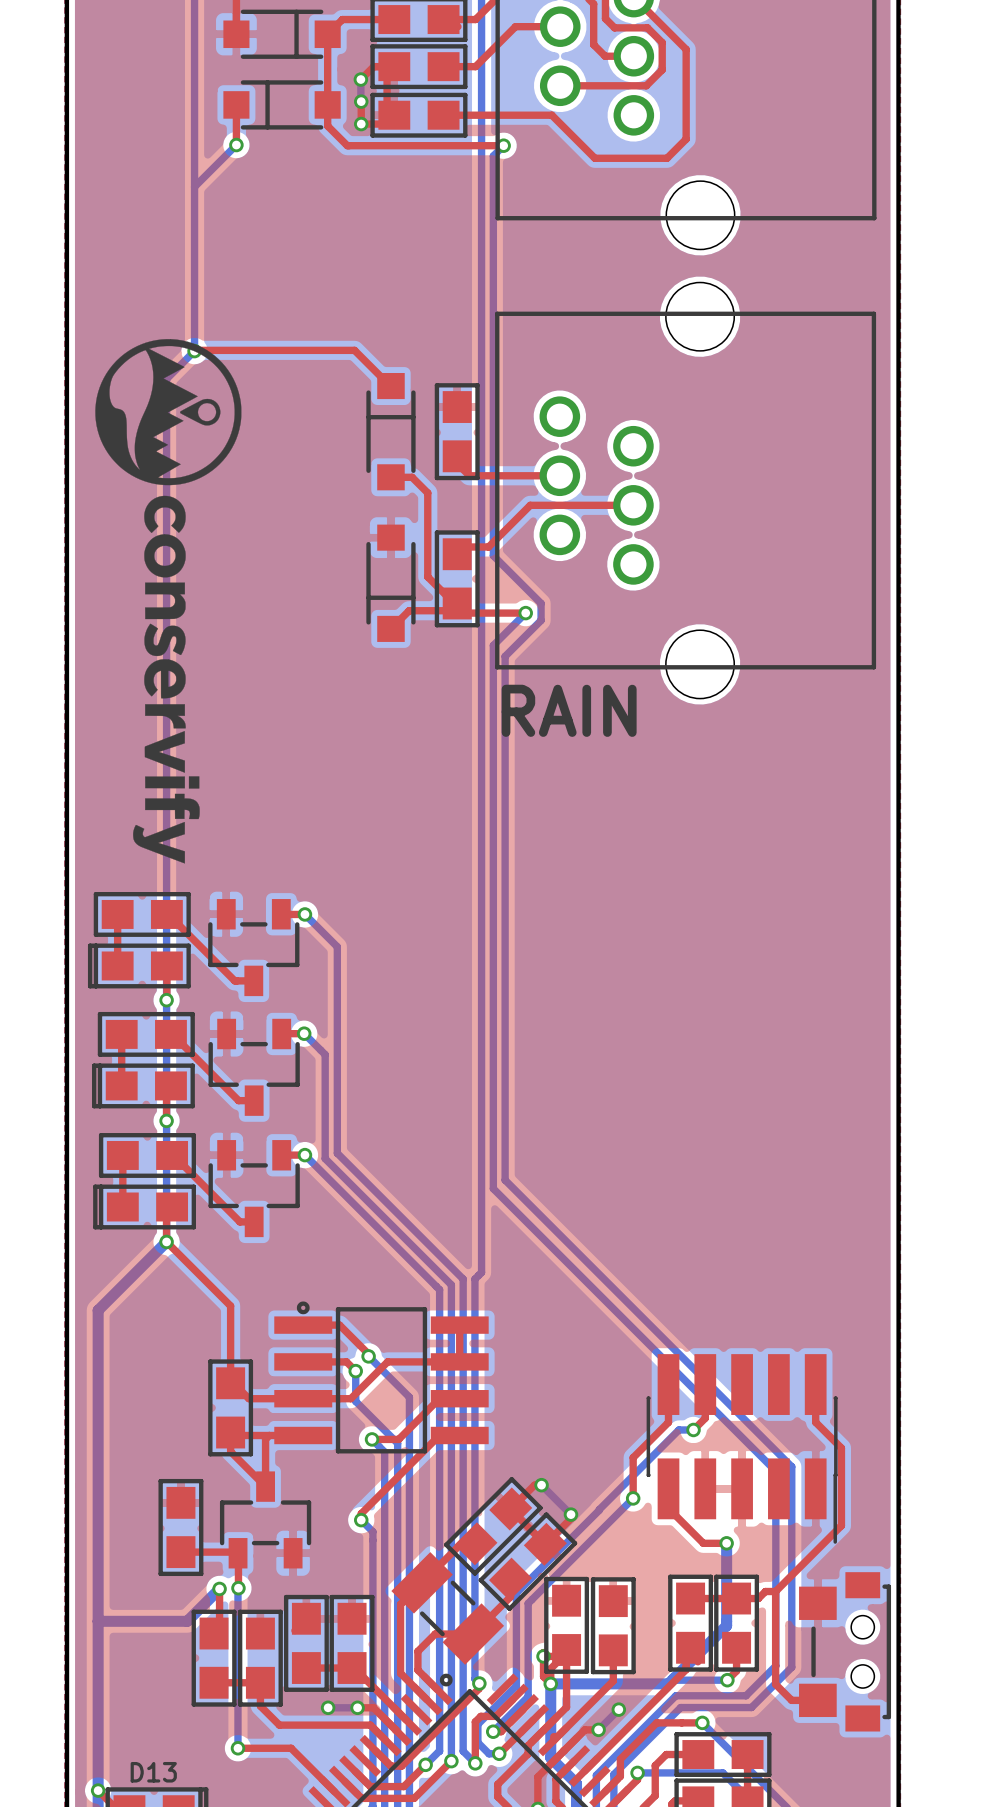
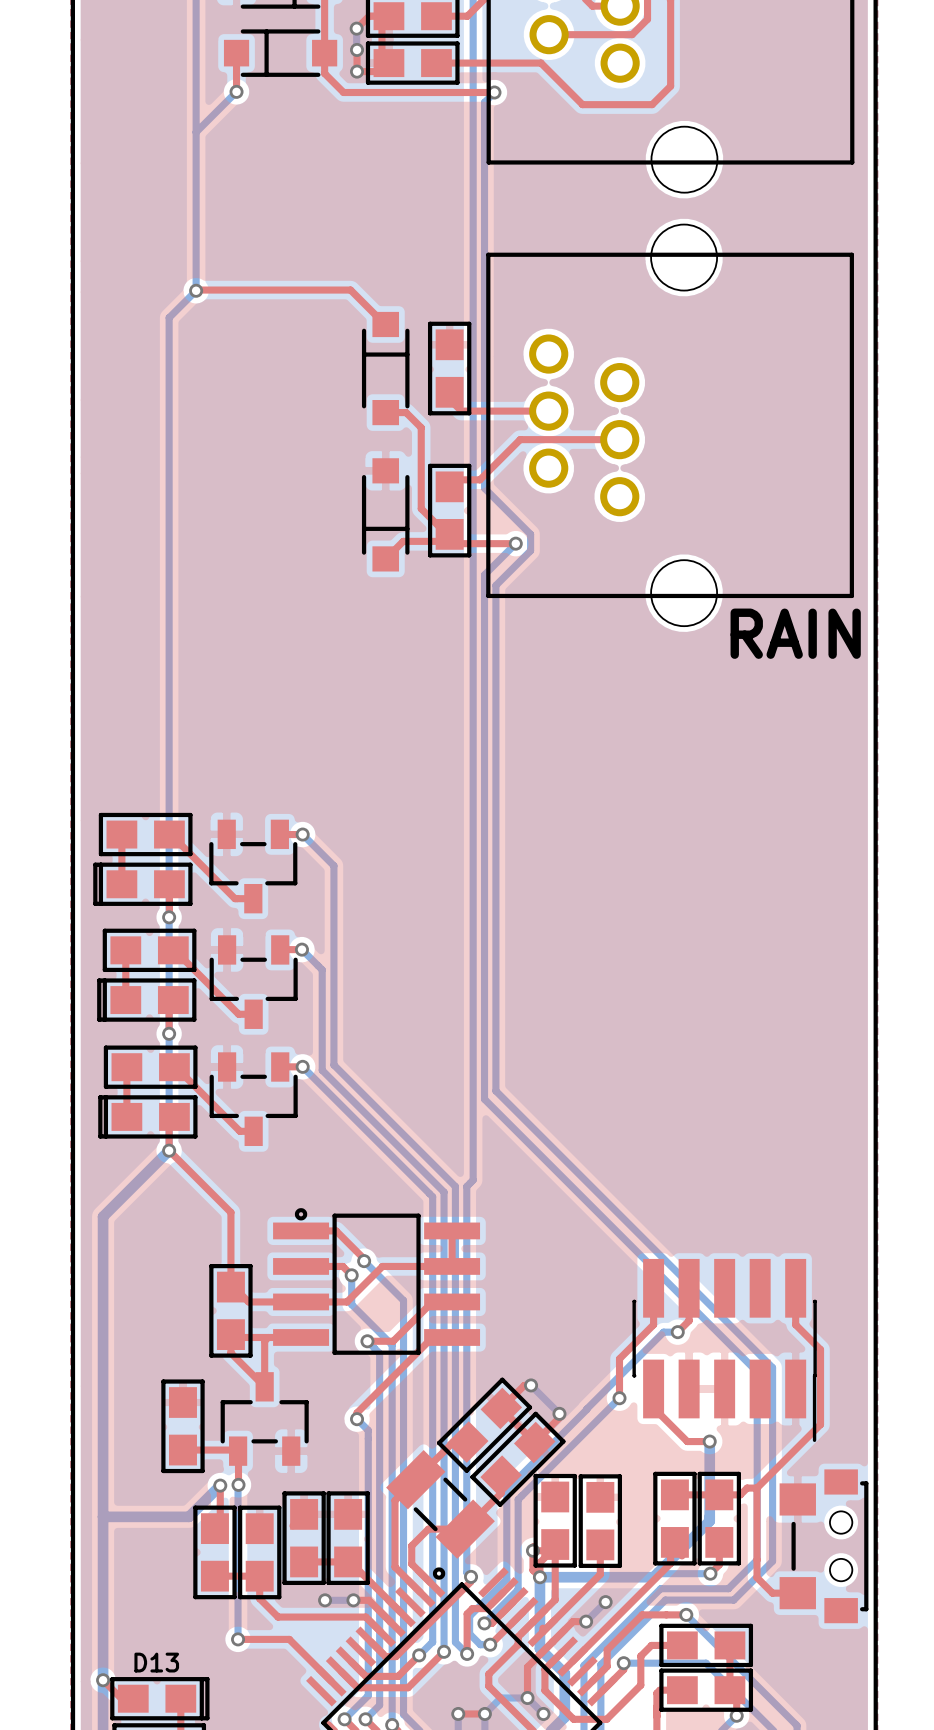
drawing: [95, 339, 242, 864] -> none
text position: RAIN (569, 710) -> RAIN (795, 633)

